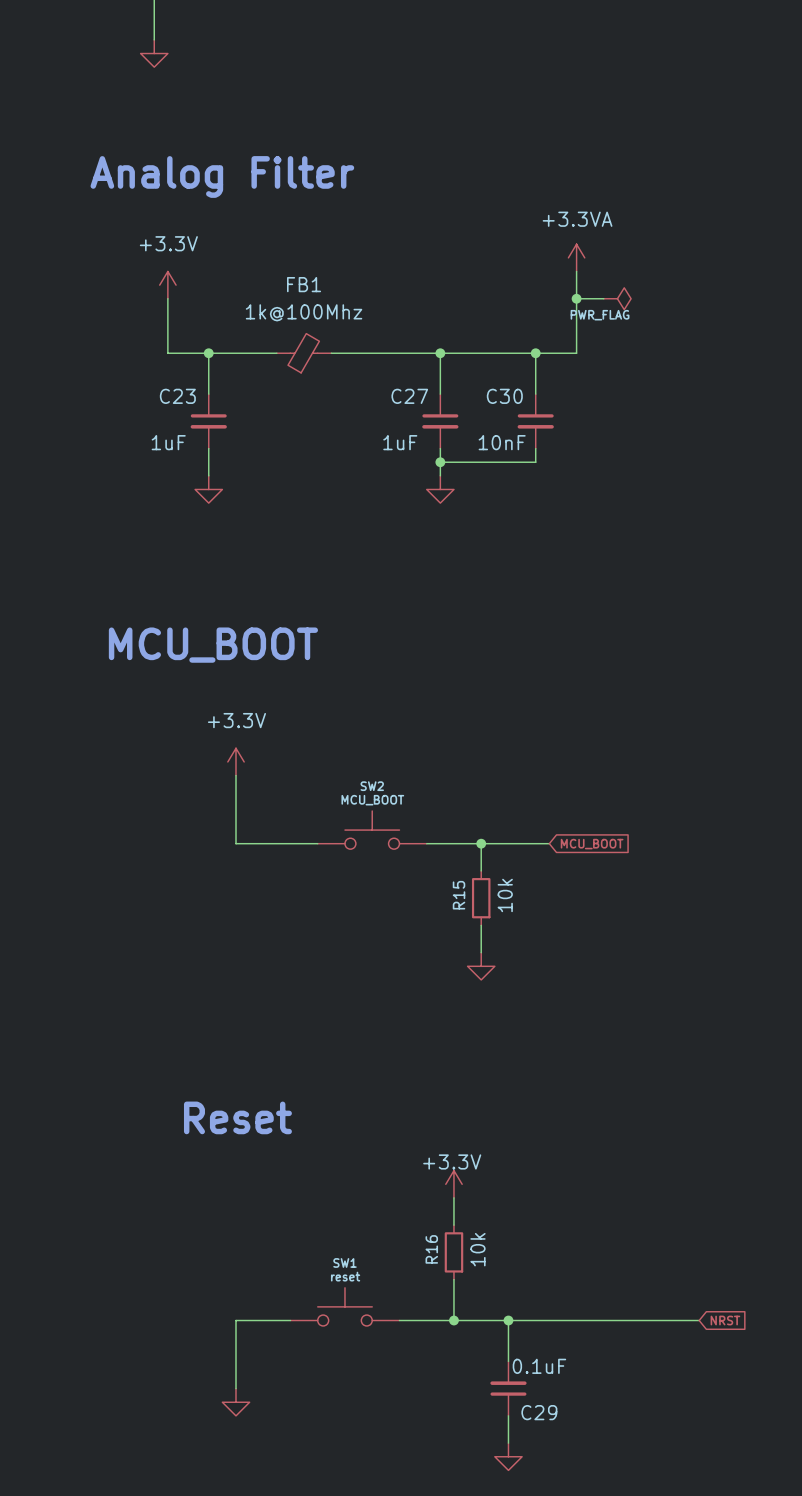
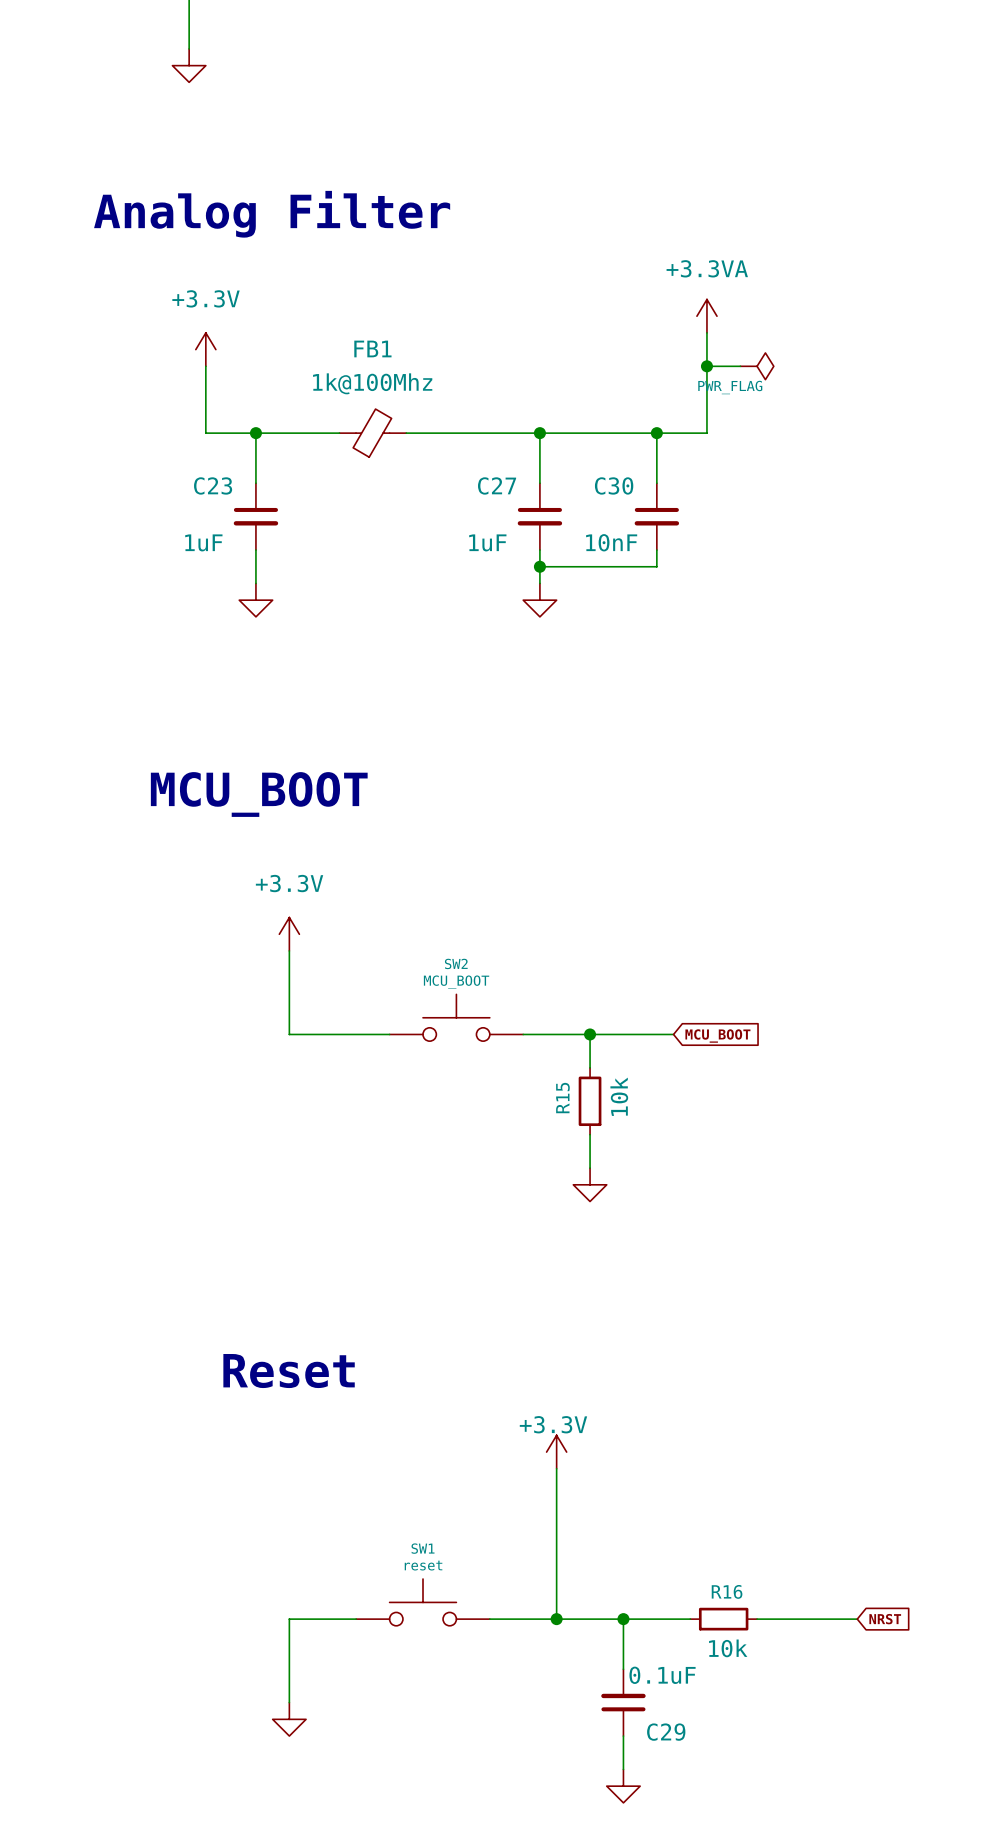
wire: none -> (556, 1502) (556, 1569)
R16 rotation: 0° (453, 1252) -> 90° clockwise (723, 1619)
R16 position: (453, 1252) -> (723, 1619)
wire: (562, 1320) (617, 1320) -> none

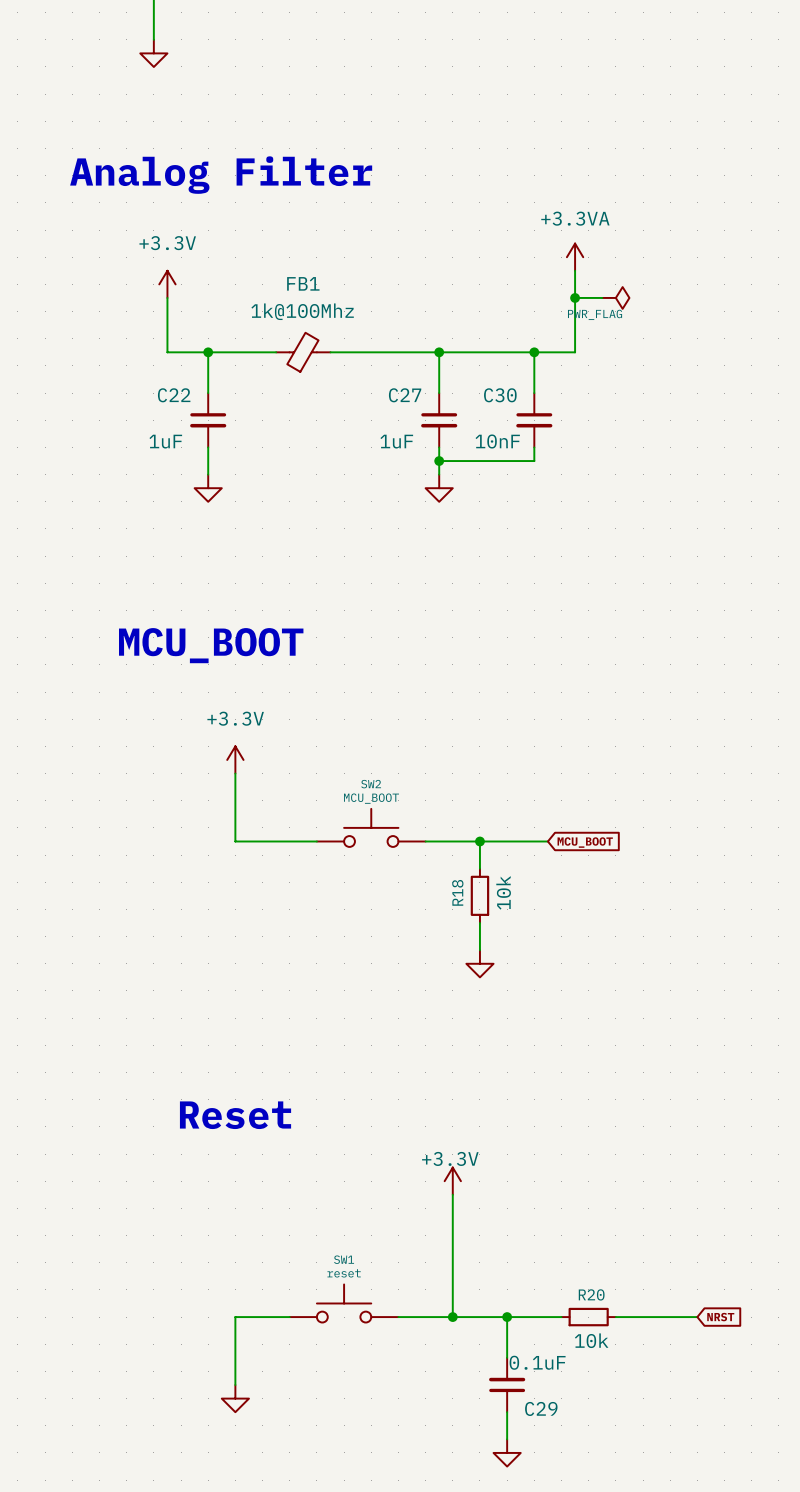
C23 name: C23 (213, 485) -> C22 (174, 395)
R15 name: R15 (562, 1098) -> R18 (457, 892)
R16 name: R16 (727, 1591) -> R20 (591, 1294)

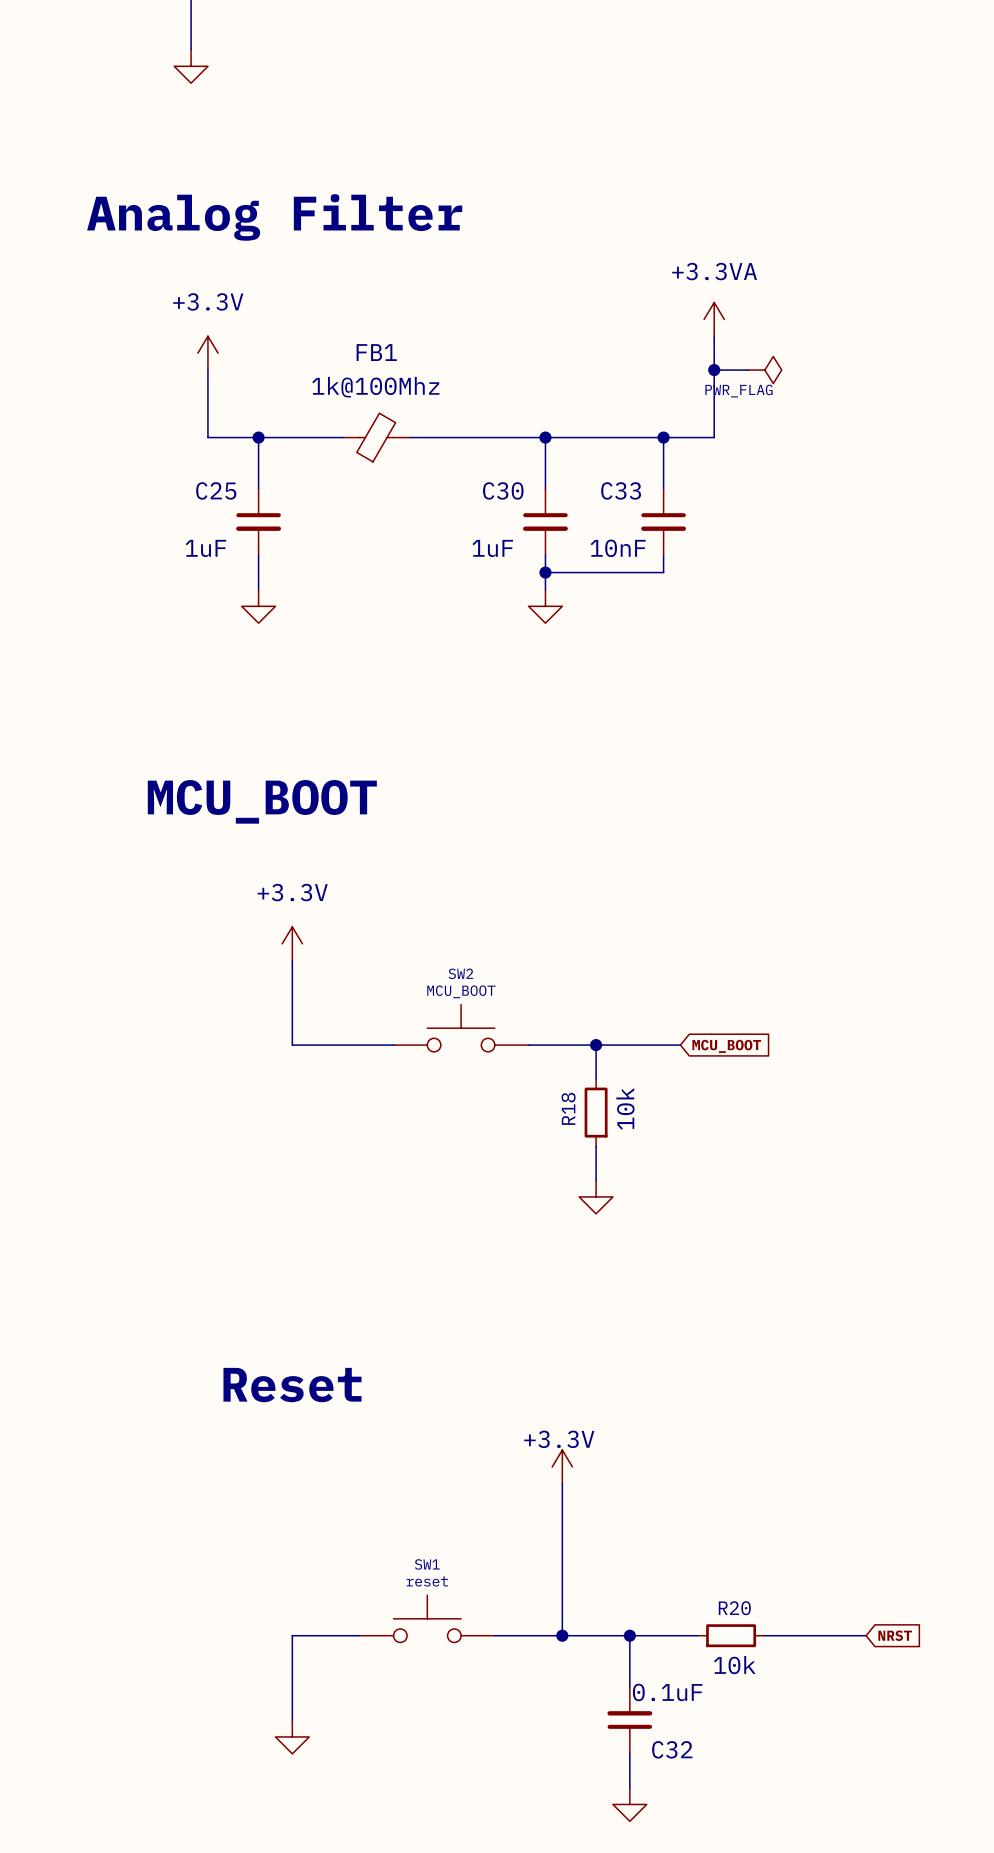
C22 name: C22 (174, 395) -> C25 (216, 490)
C27 name: C27 (405, 395) -> C30 (503, 490)
C30 name: C30 (500, 395) -> C33 (621, 490)
C29 name: C29 (541, 1408) -> C32 (672, 1749)

